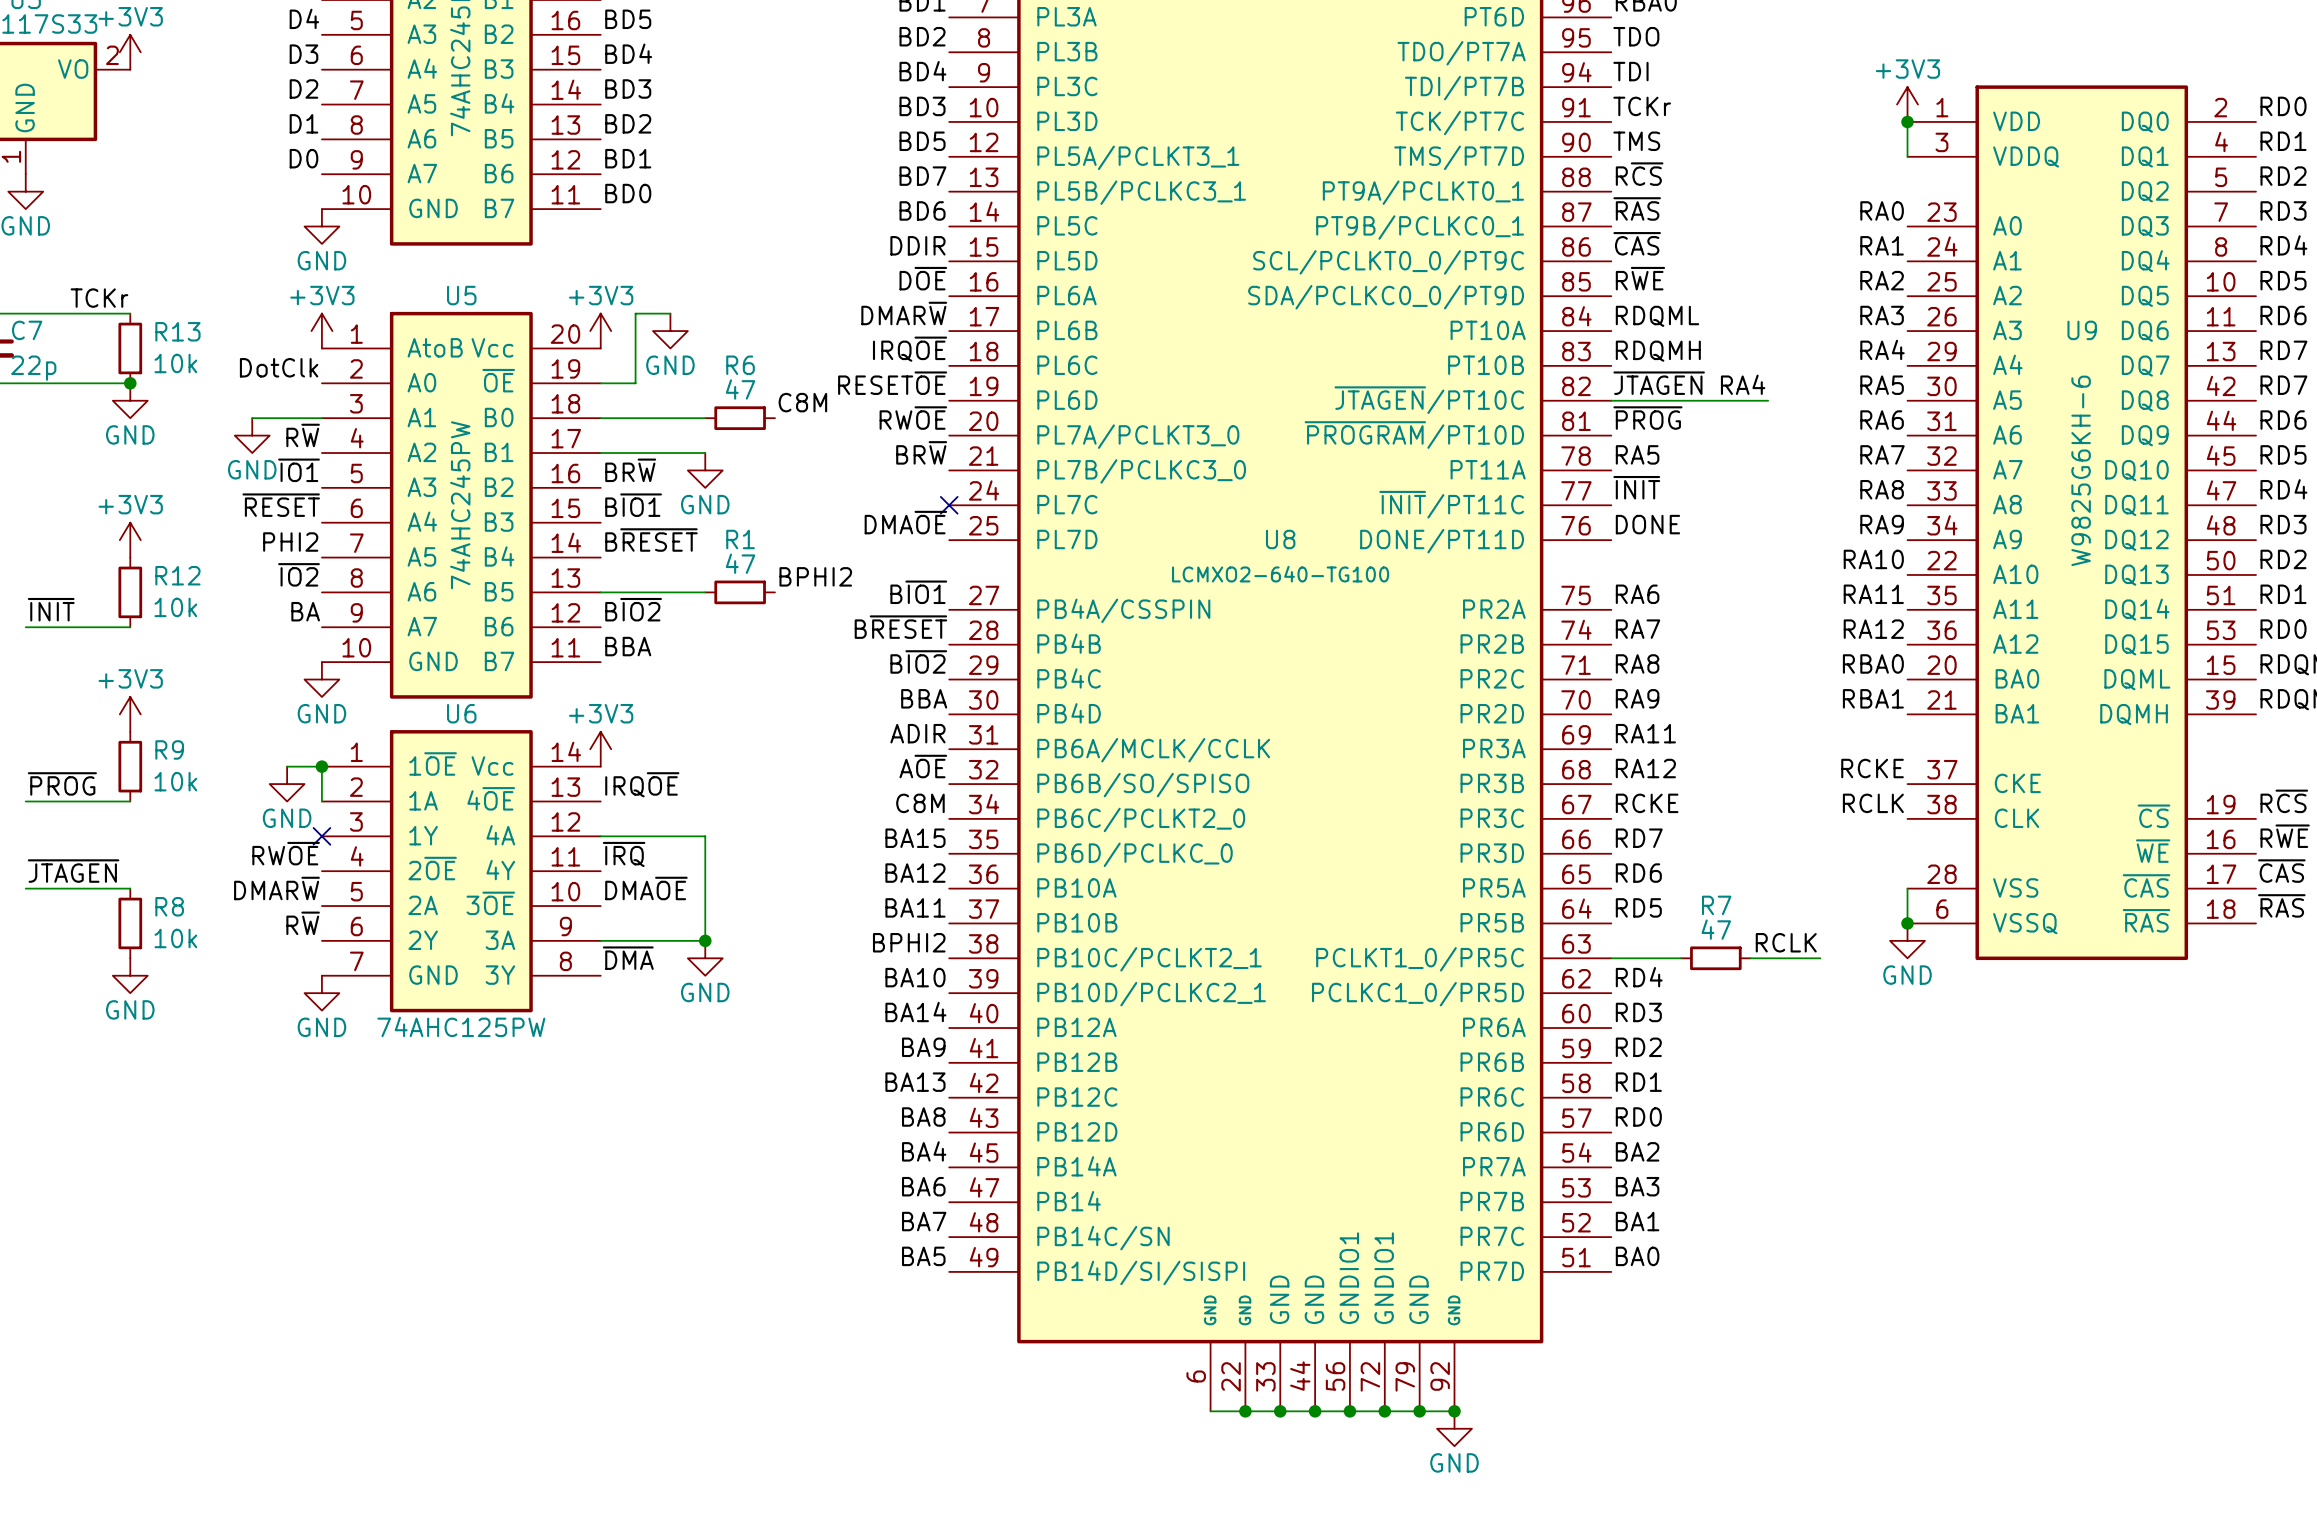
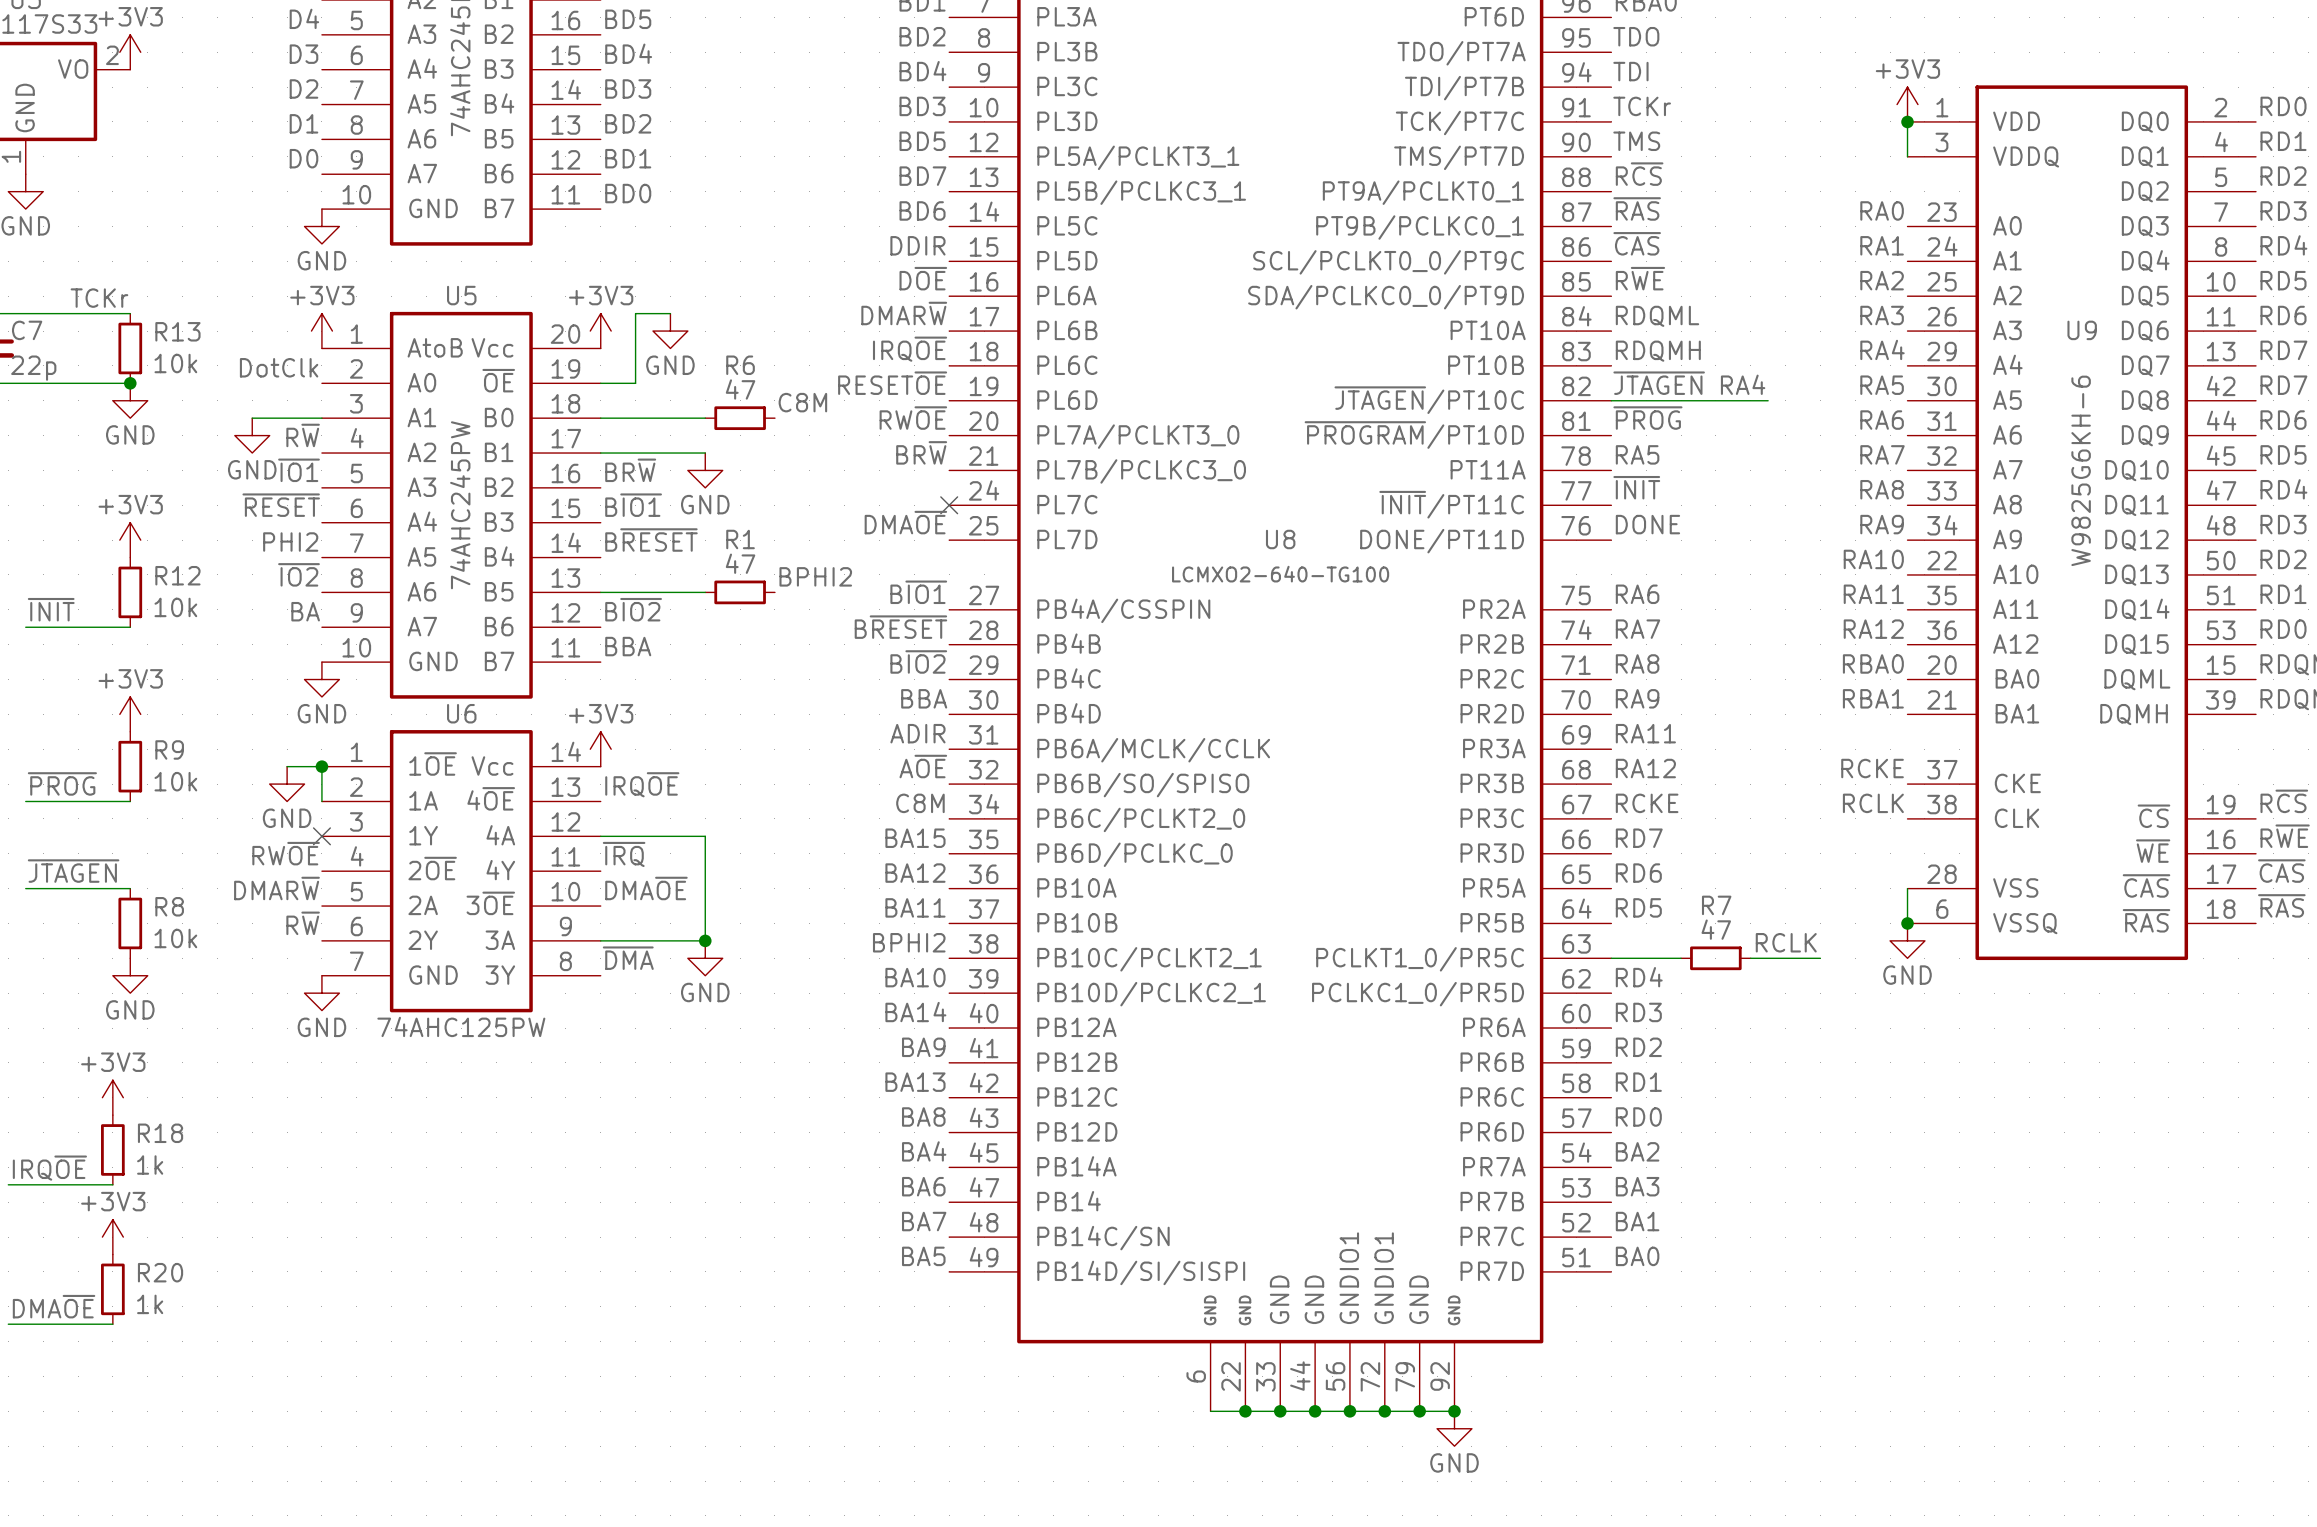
power symbol: none -> +3V3 (112, 1097)
R18: none -> 1k (112, 1149)
label: none -> IRQ~{OE} (49, 1168)
wire: none -> (8, 1184) (112, 1184)
power symbol: none -> +3V3 (112, 1237)
R20: none -> 1k (112, 1289)
label: none -> DMA~{OE} (54, 1306)
wire: none -> (8, 1324) (112, 1324)

